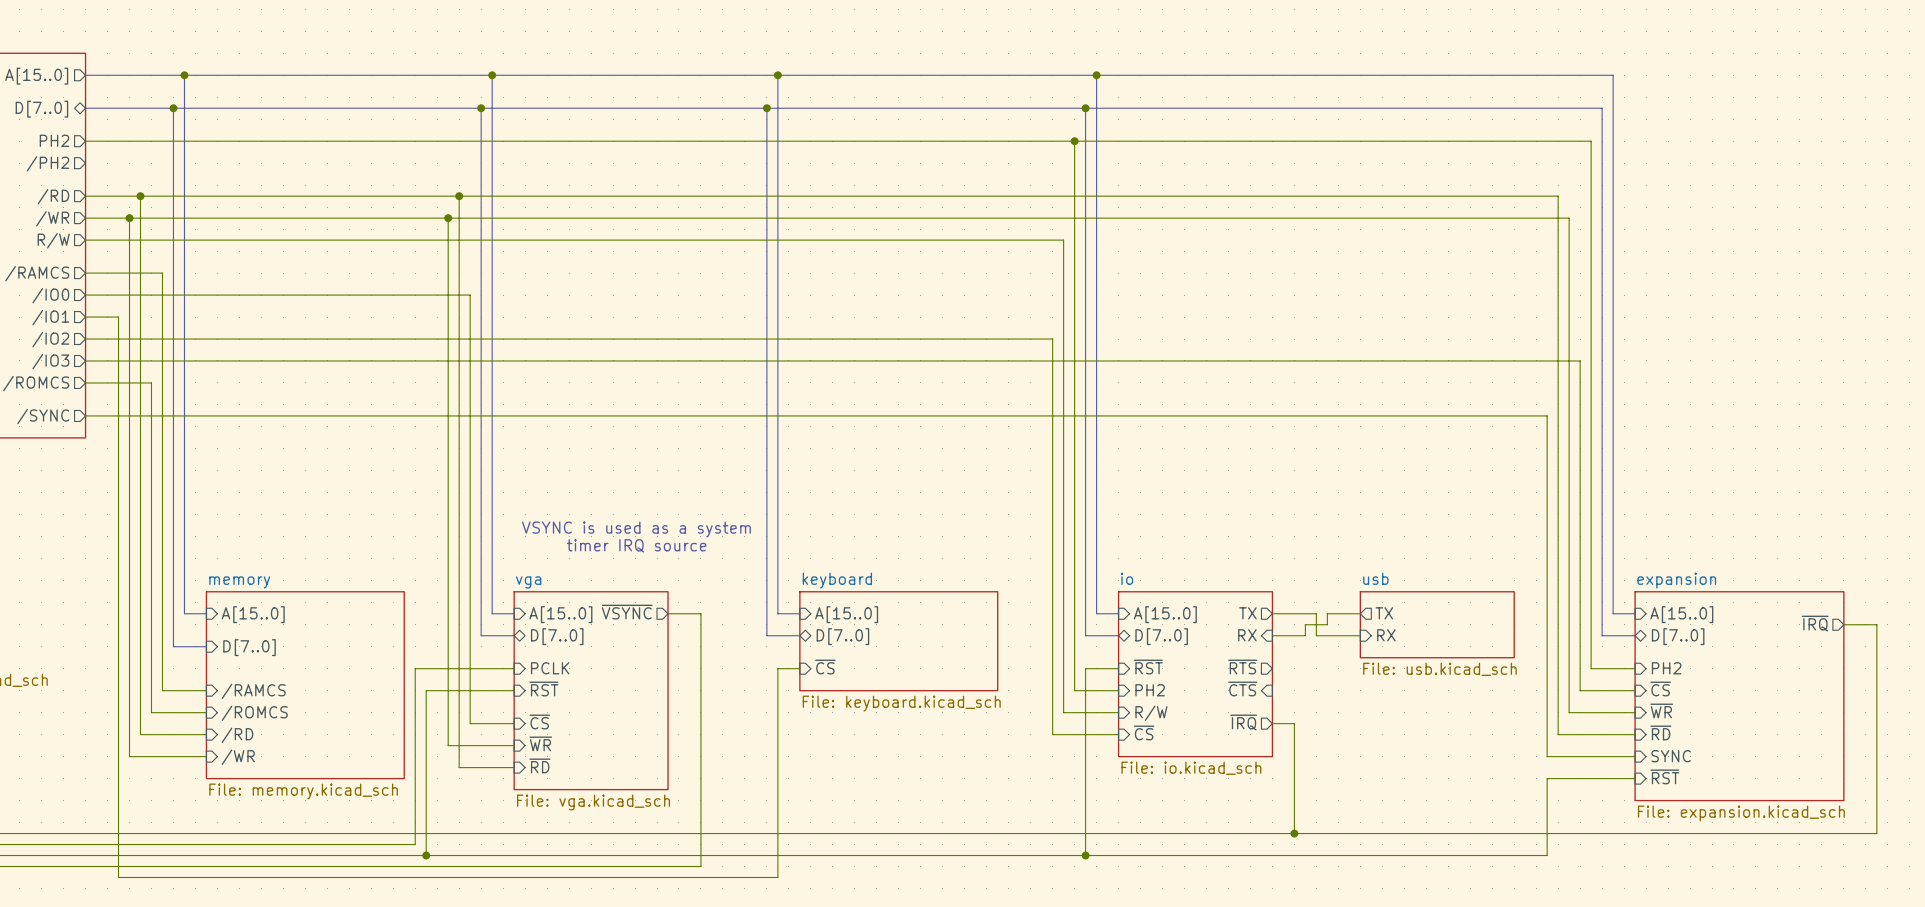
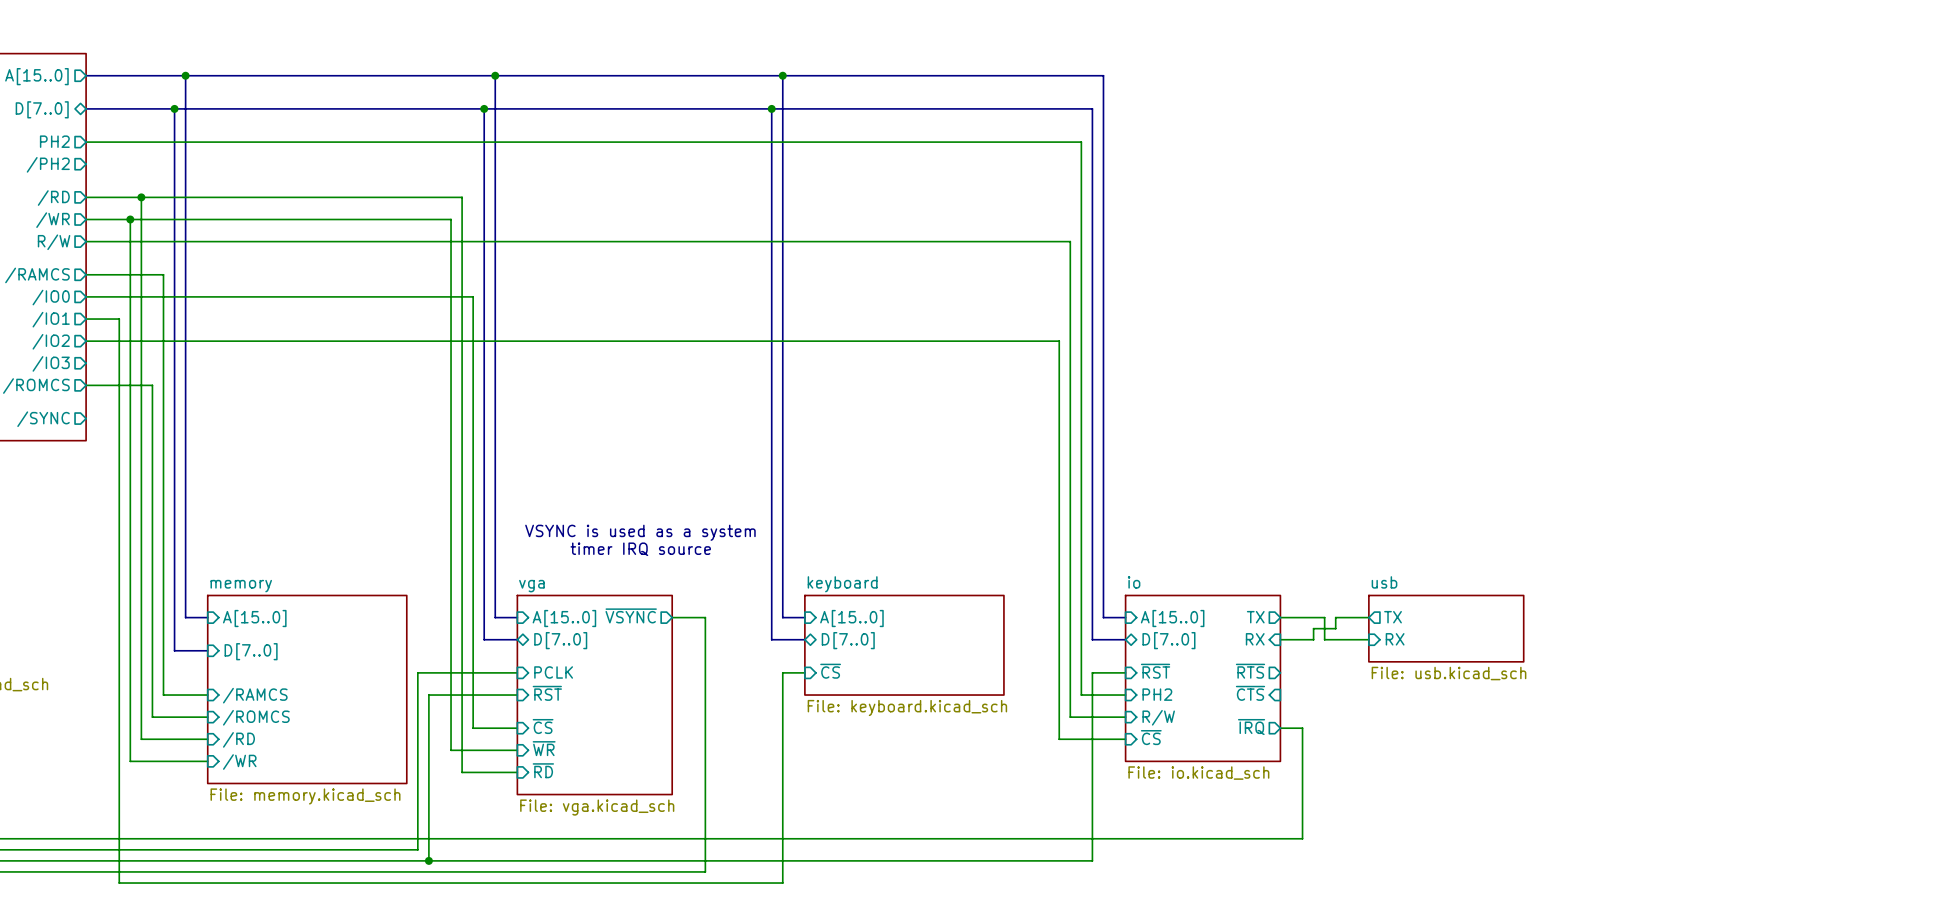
bus: (1096, 75) (1613, 75) (1613, 613) (1635, 613) -> none
junction: (1096, 75) -> none
bus: (1085, 108) (1602, 108) (1602, 635) (1635, 635) -> none
junction: (1085, 108) -> none
wire: (1074, 141) (1591, 141) (1591, 668) (1635, 668) -> none
junction: (1074, 141) -> none
wire: (459, 196) (1558, 196) (1558, 734) (1635, 734) -> none
junction: (459, 196) -> none
wire: (448, 218) (1569, 218) (1569, 712) (1635, 712) -> none
junction: (448, 218) -> none
wire: (85, 360) (1580, 360) (1580, 690) (1635, 690) -> none
wire: (85, 415) (1547, 415) (1547, 756) (1635, 756) -> none
sheet pin: A[15..0] (1681, 614) -> none
sheet pin: ~{IRQ} (1815, 623) -> none
wire: (1843, 624) (1876, 624) (1876, 833) (1294, 833) -> none
sheet pin: D[7..0] (1678, 636) -> none
sheet pin: PH2 (1666, 668) -> none
sheet pin: ~{CS} (1660, 689) -> none
sheet expansion: File: expansion.kicad_sch (1739, 696) -> none
sheet pin: ~{WR} (1661, 710) -> none
sheet pin: ~{RD} (1660, 732) -> none
sheet pin: SYNC (1671, 756) -> none
sheet pin: ~{RST} (1664, 776) -> none
wire: (1635, 778) (1547, 778) (1547, 855) (1085, 855) -> none
junction: (1294, 833) -> none
junction: (1085, 855) -> none

